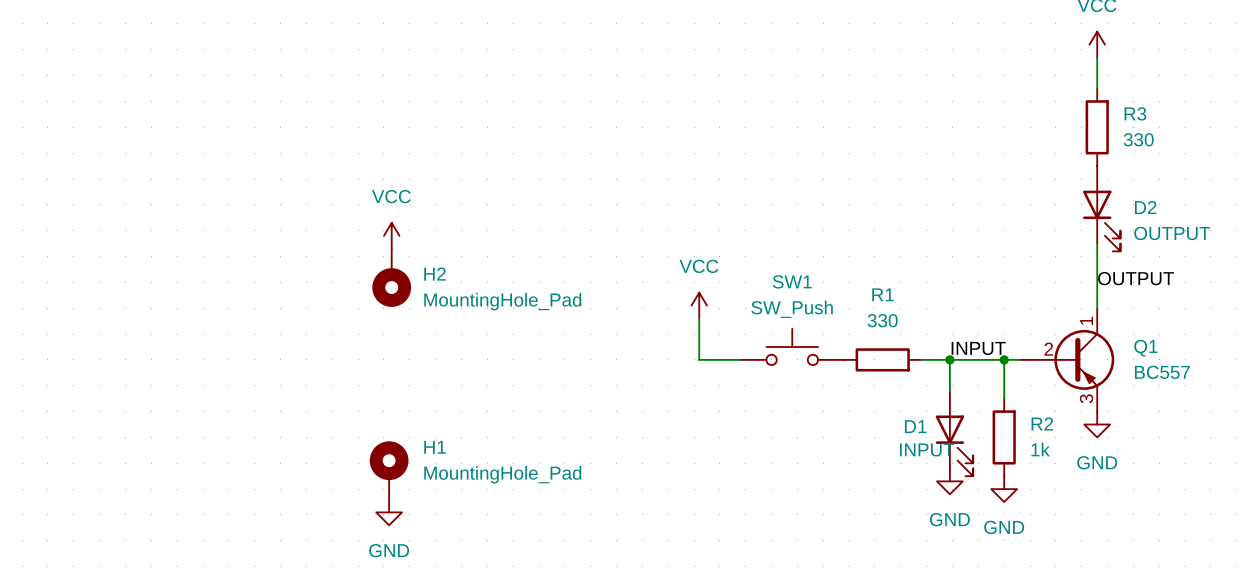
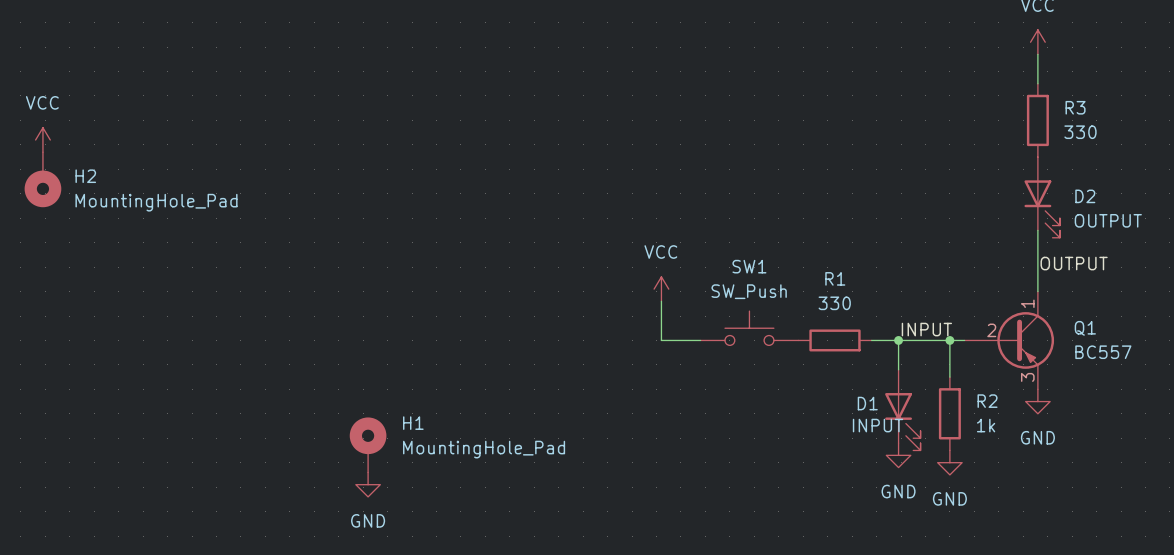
power symbol: none -> VCC (42, 140)
power symbol: VCC (391, 235) -> none
H2 position: (391, 277) -> (42, 179)

